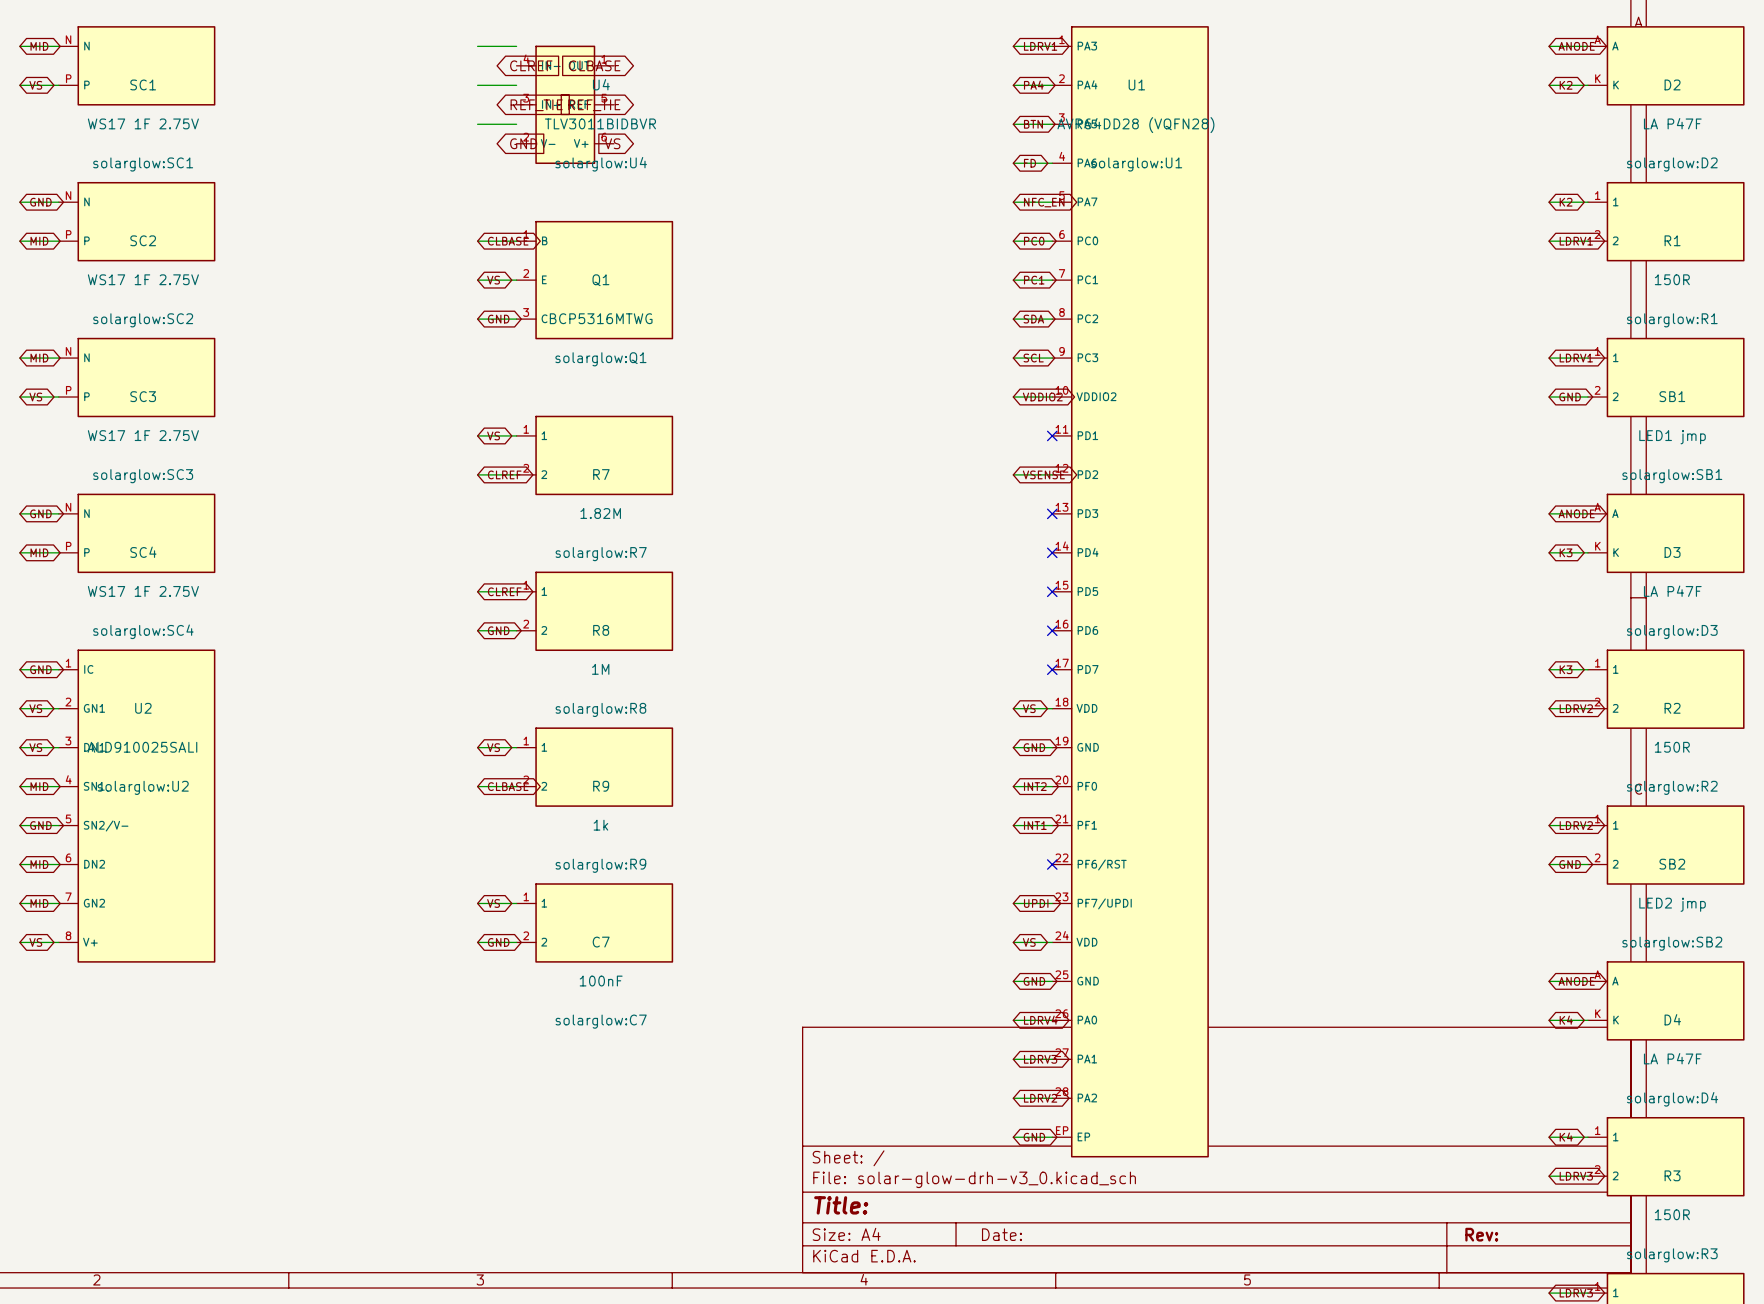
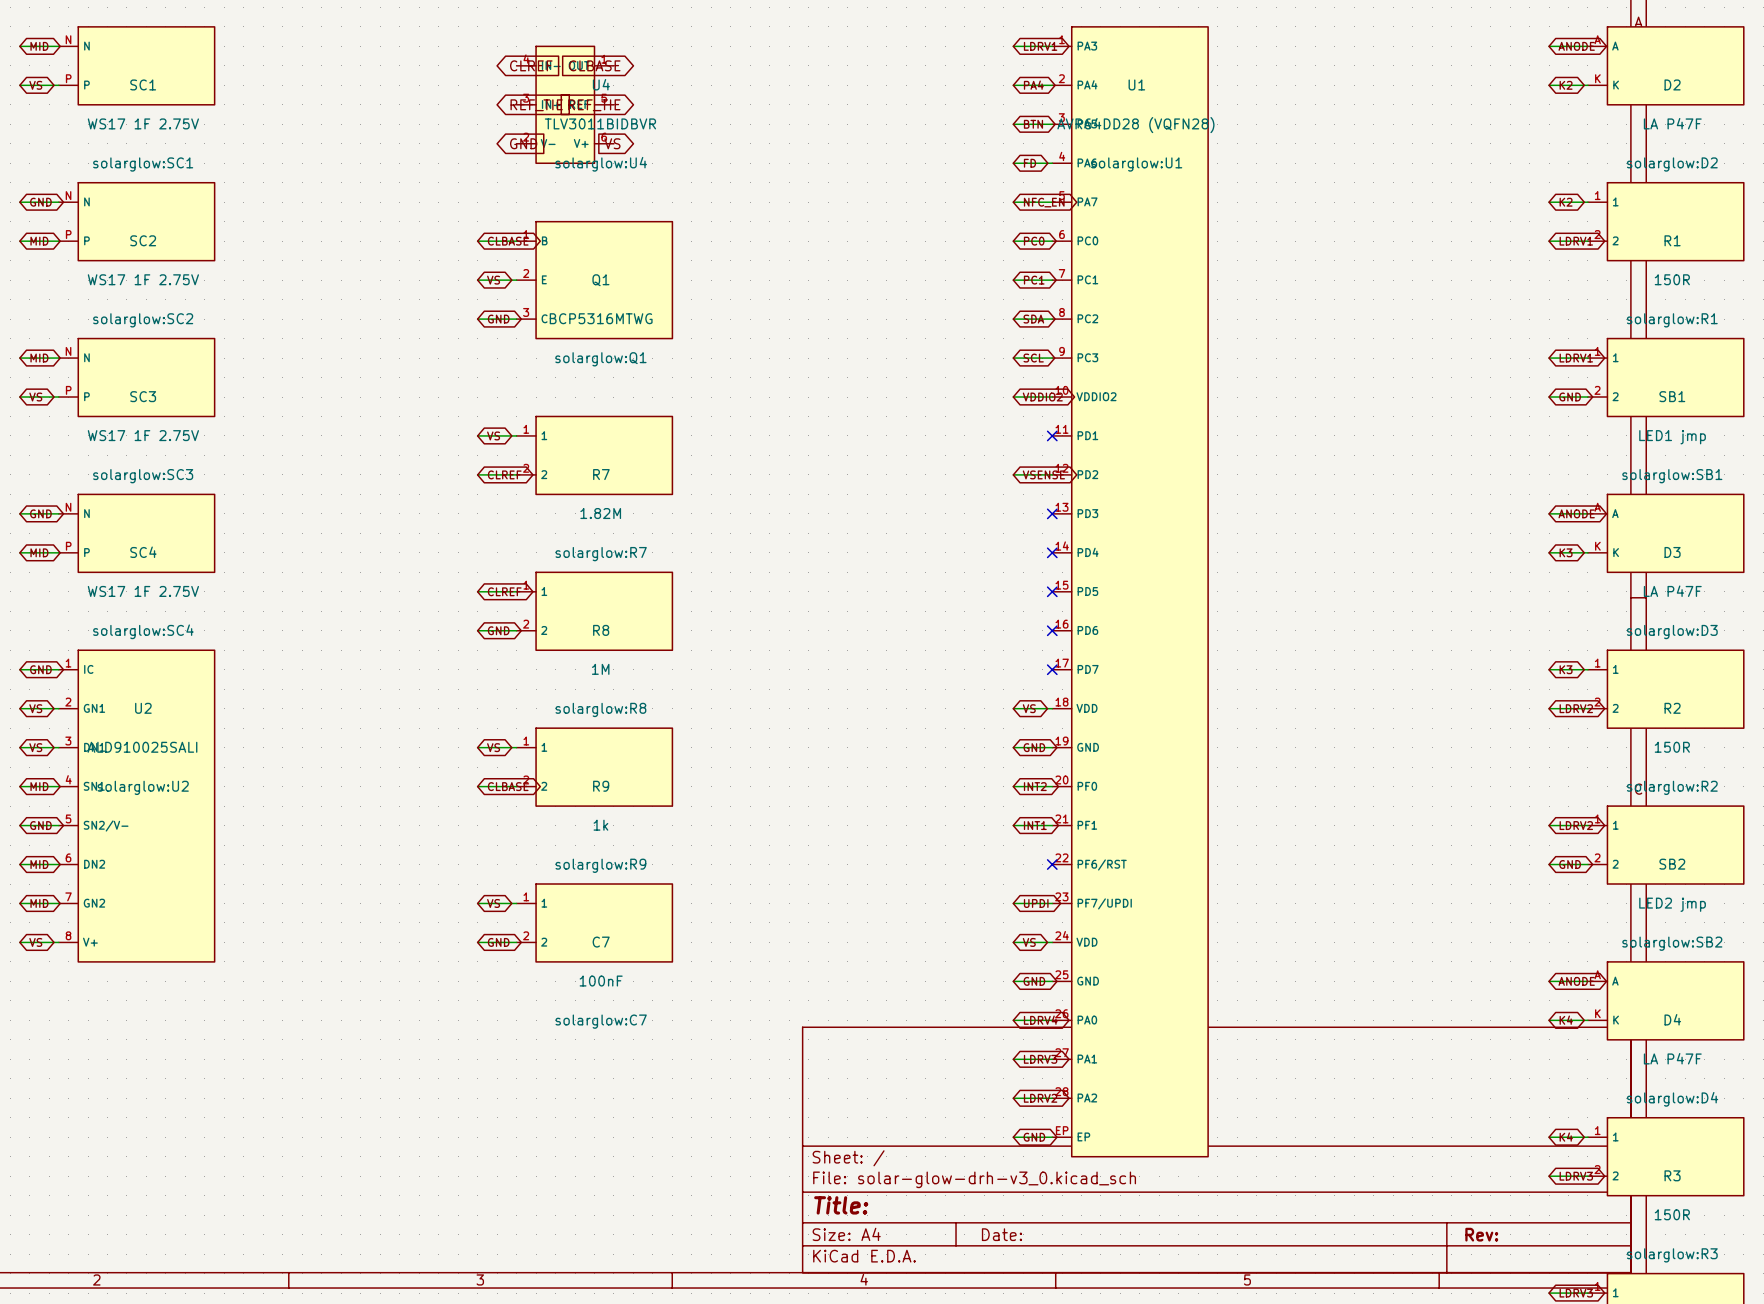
wire: (477, 46) (516, 46) -> none
wire: (477, 85) (516, 85) -> none
wire: (477, 124) (516, 124) -> none

